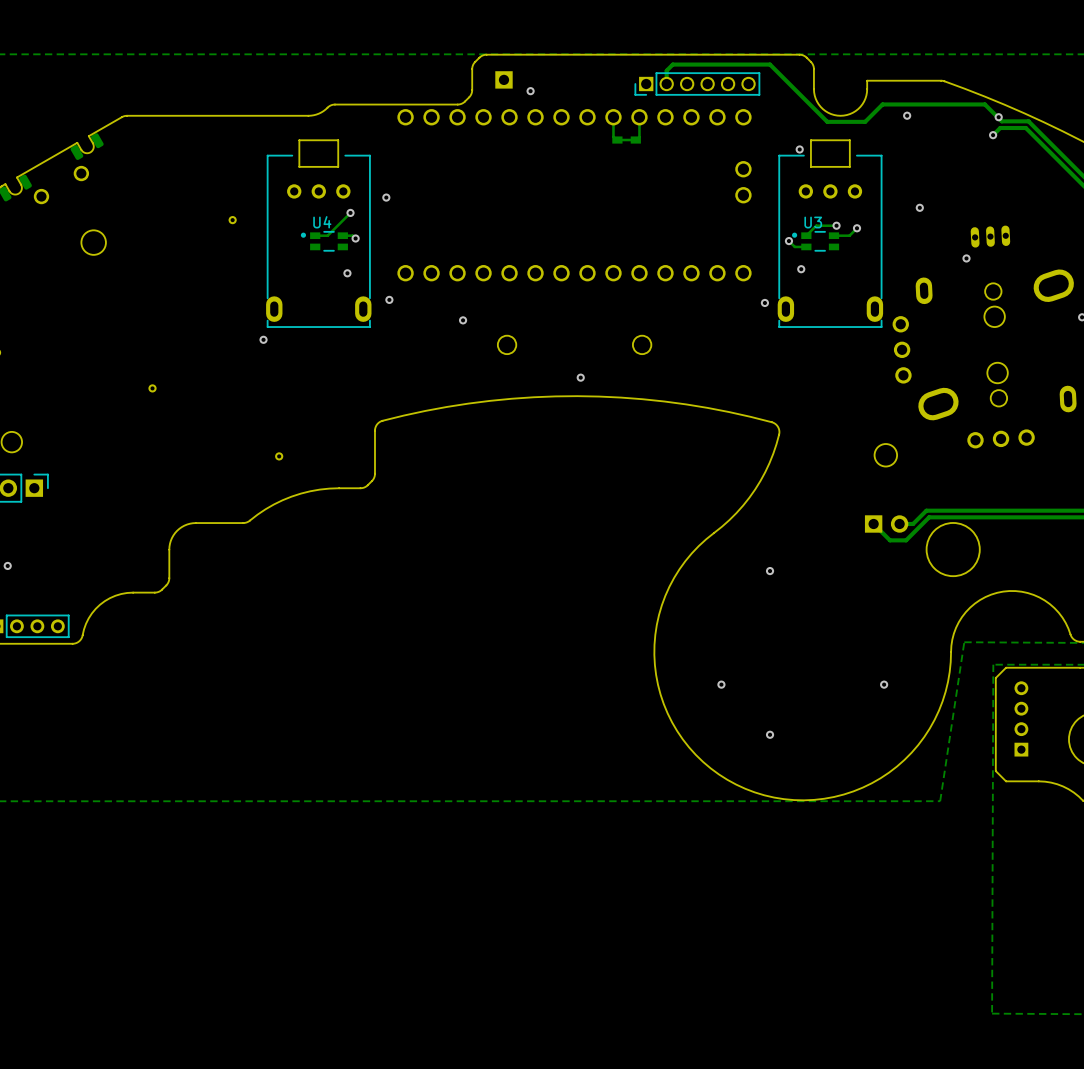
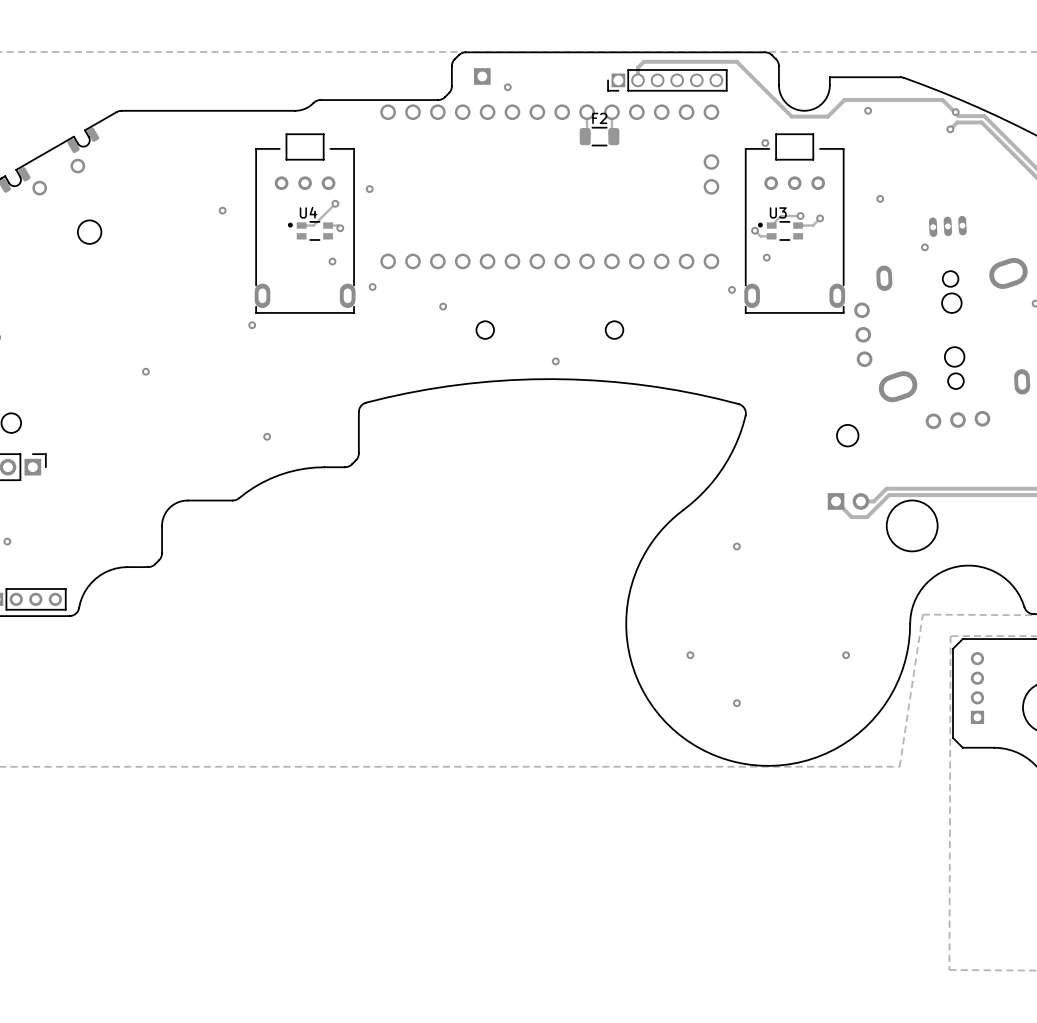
part: (626, 140) -> none
track: (635, 140) (617, 140) -> none
F2: none -> (599, 136)

